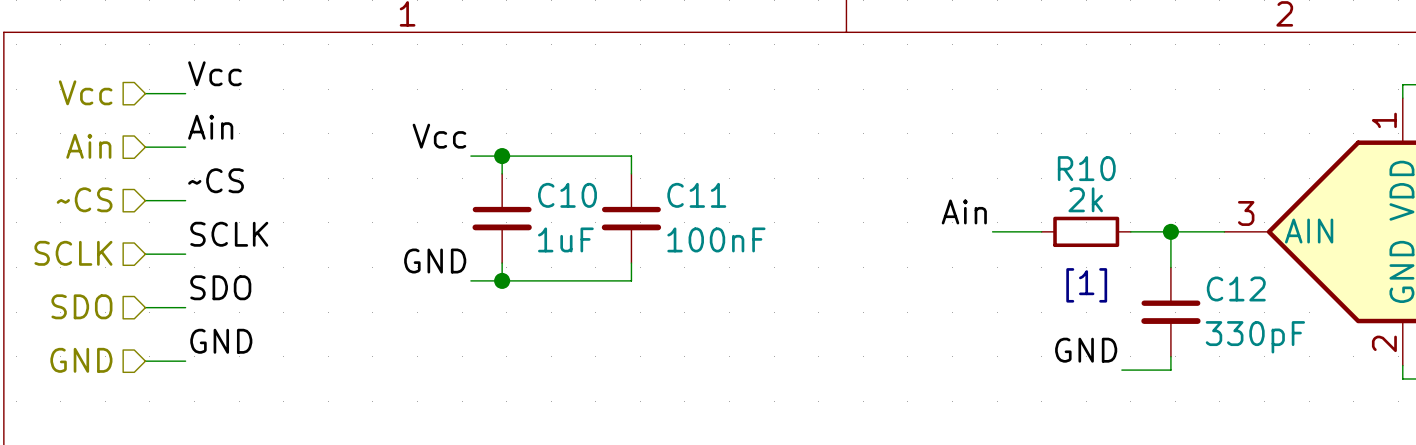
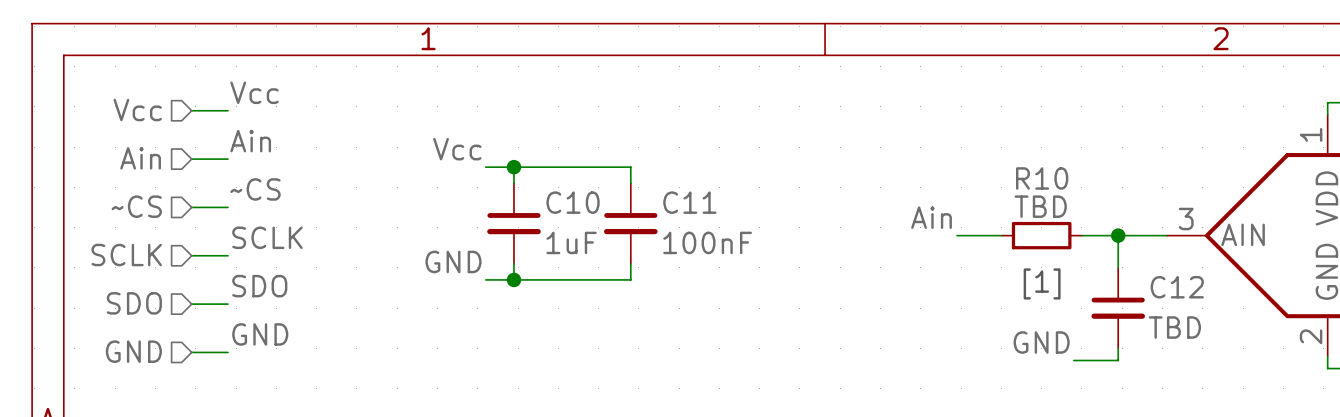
R10 value: 2k (1085, 199) -> TBD (1040, 206)
C12 value: 330pF (1255, 337) -> TBD (1174, 327)

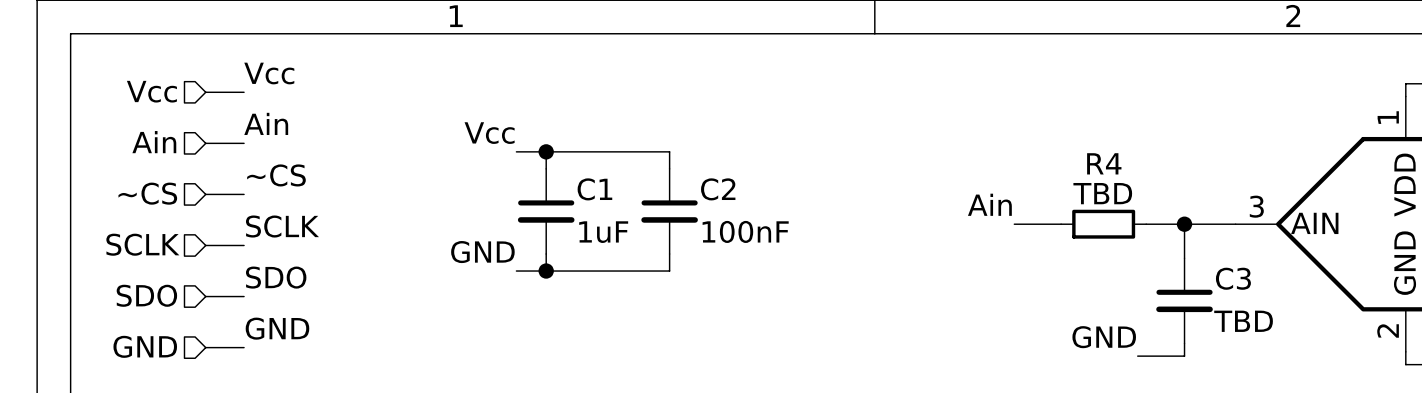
R10 name: R10 (1042, 178) -> R4 (1104, 163)
C10 name: C10 (573, 202) -> C1 (594, 189)
C11 name: C11 (689, 202) -> C2 (718, 189)
text: [1] (1042, 283) -> none
C12 name: C12 (1177, 287) -> C3 (1233, 278)

